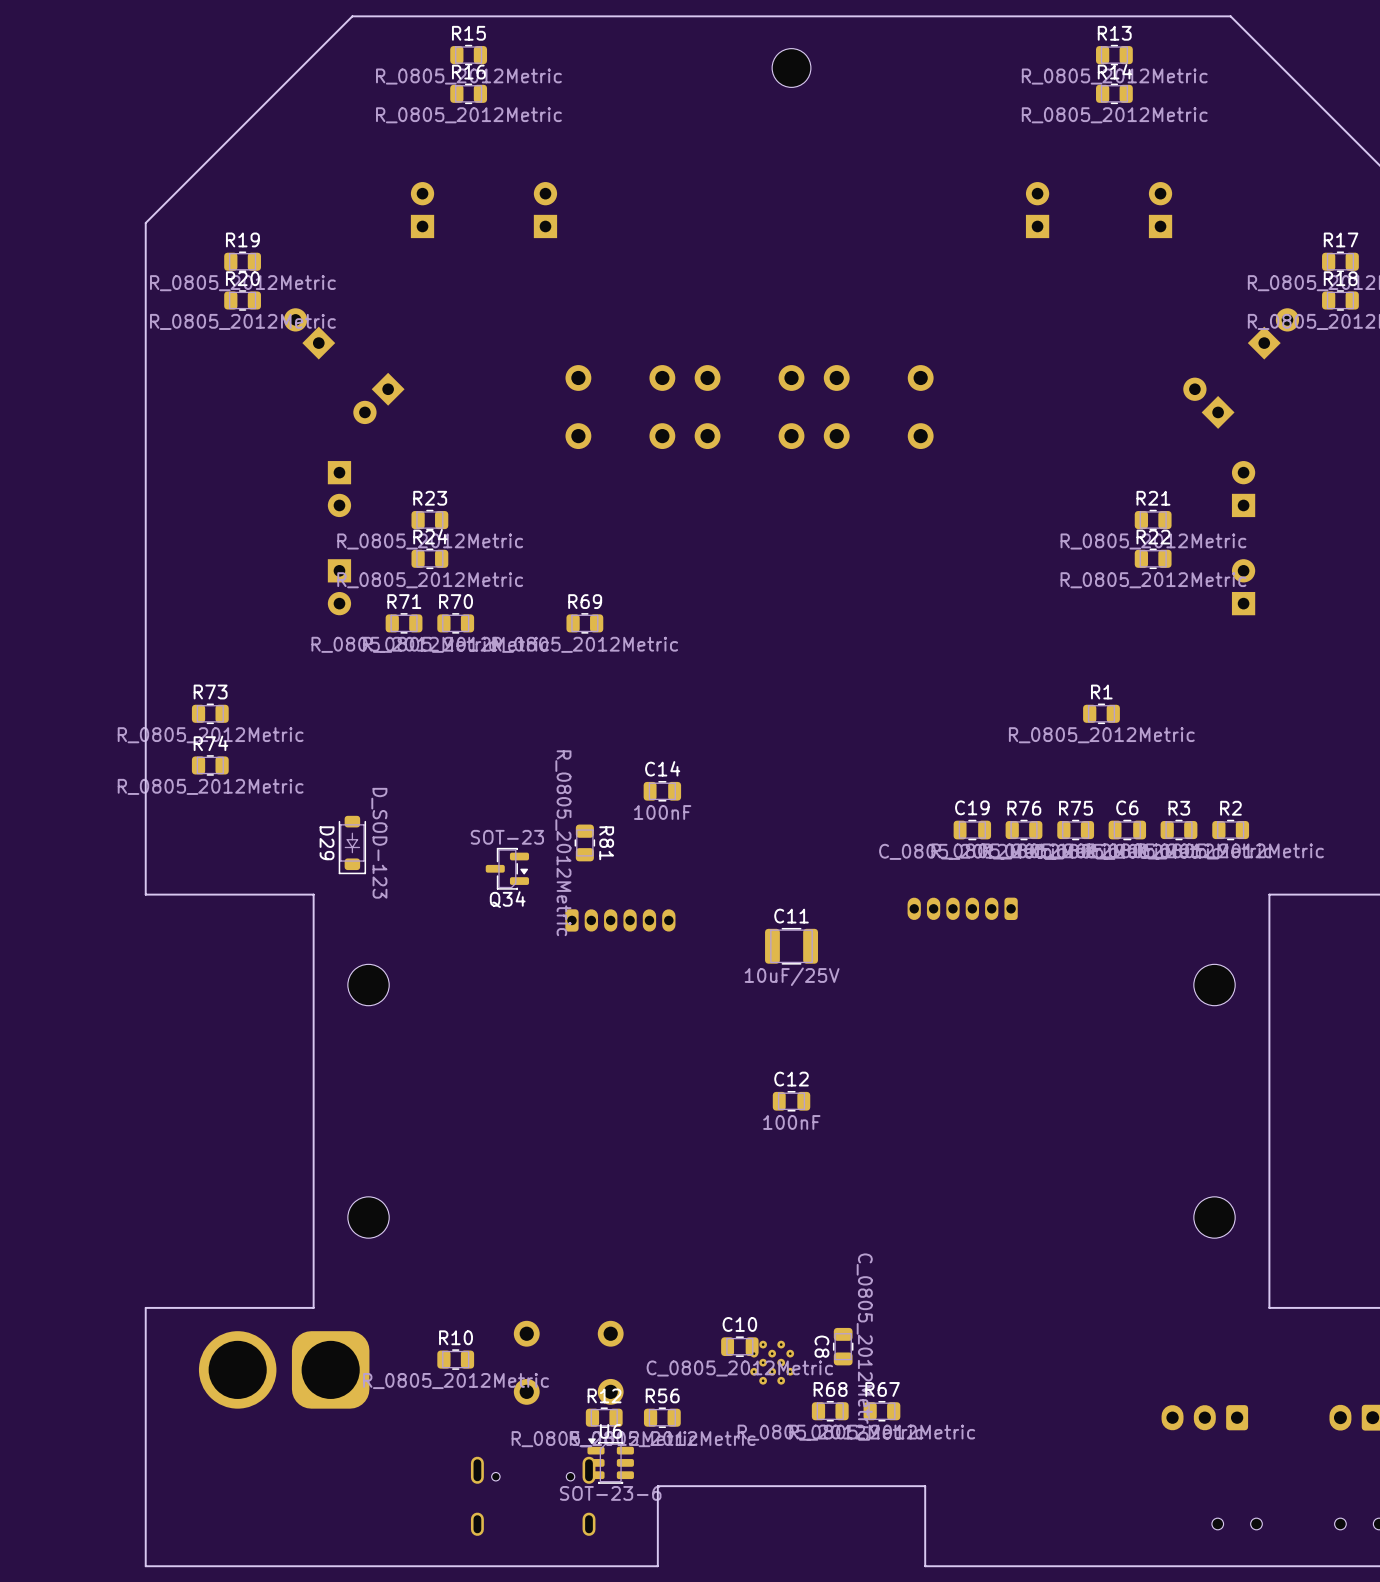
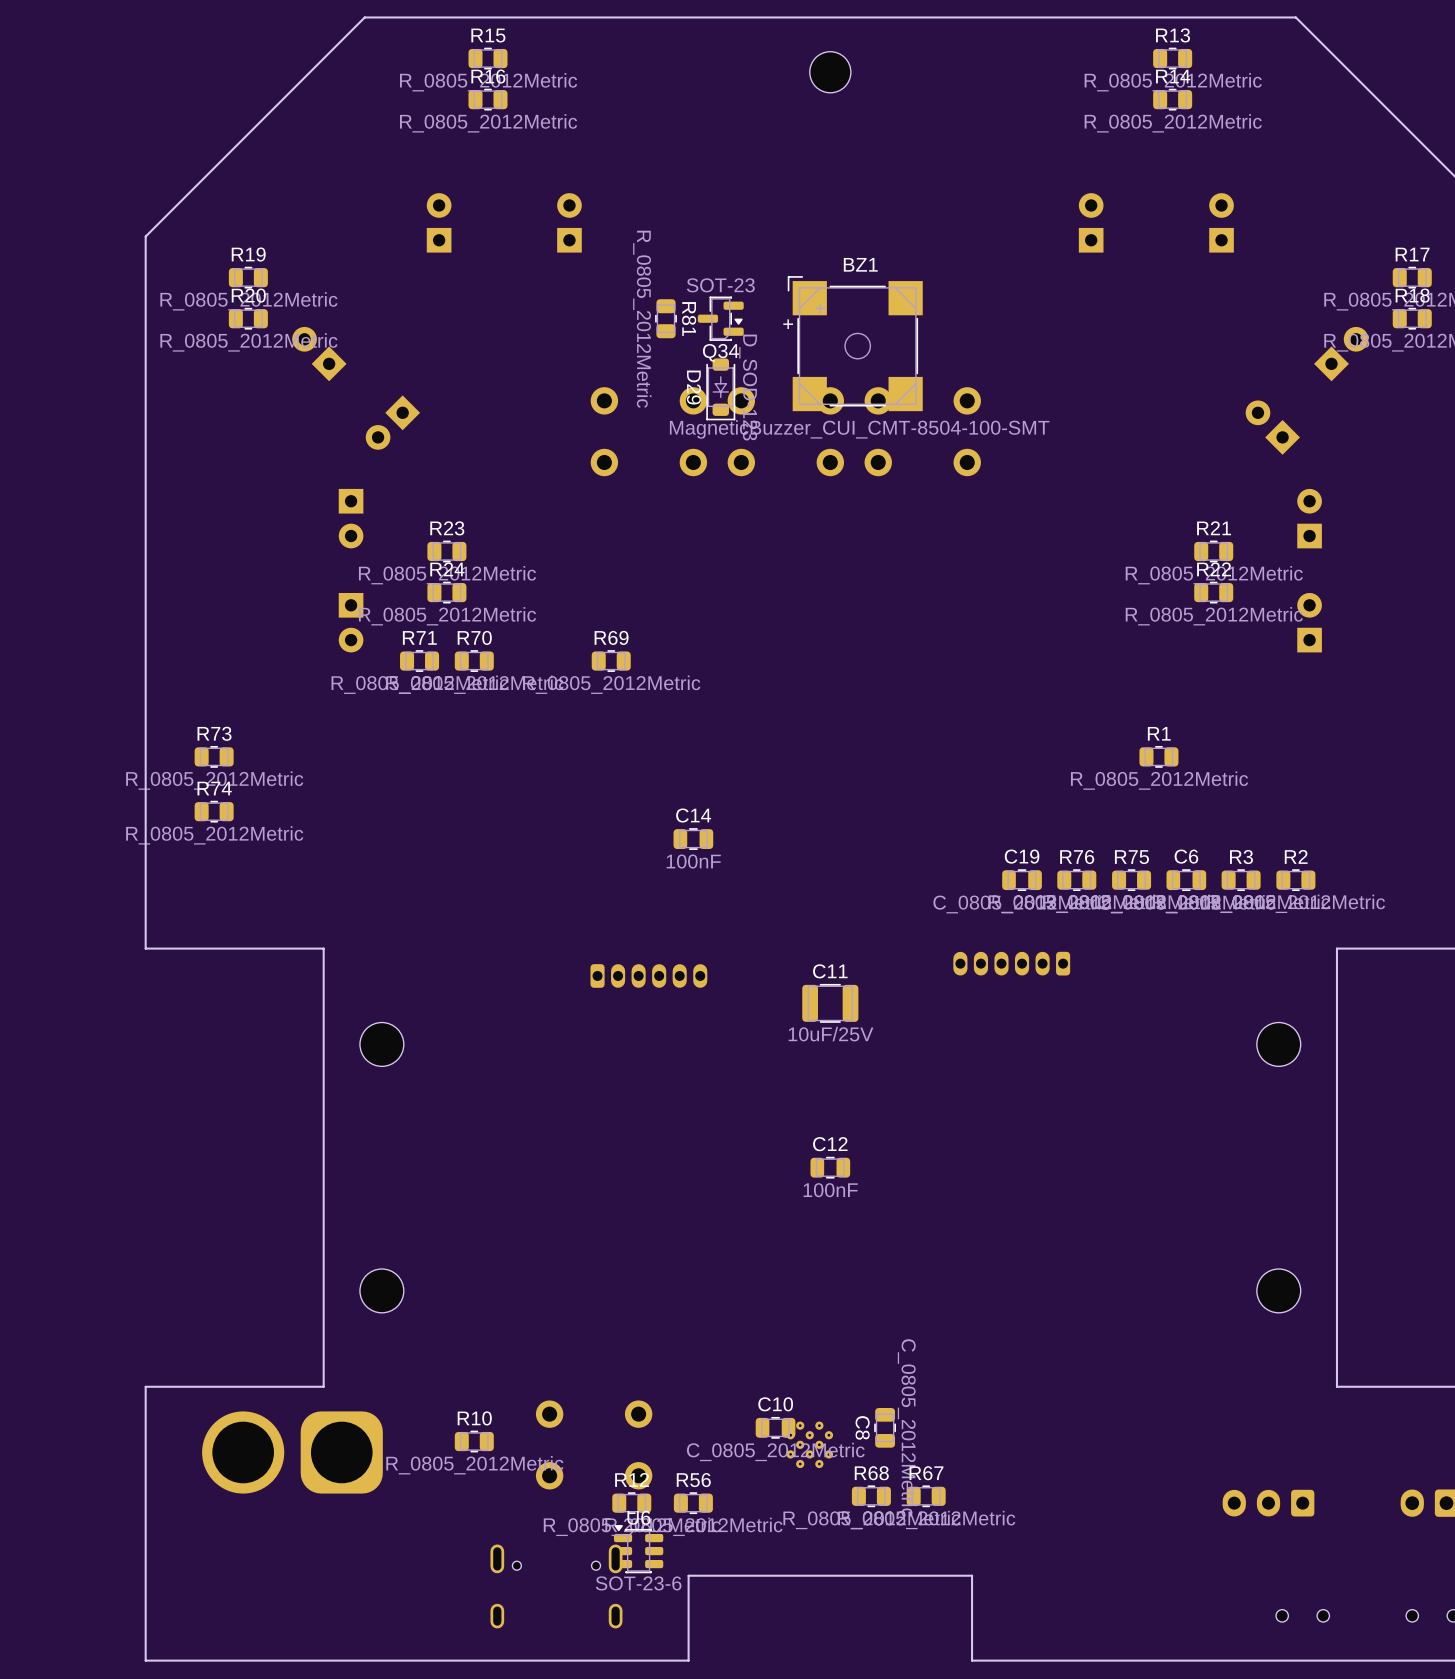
BZ1: none -> MagneticBuzzer_CUI_CMT-8504-100-SMT (855, 343)
R81 position: (584, 842) -> (666, 318)
D29 position: (352, 845) -> (720, 389)
Q34 position: (507, 868) -> (720, 318)

